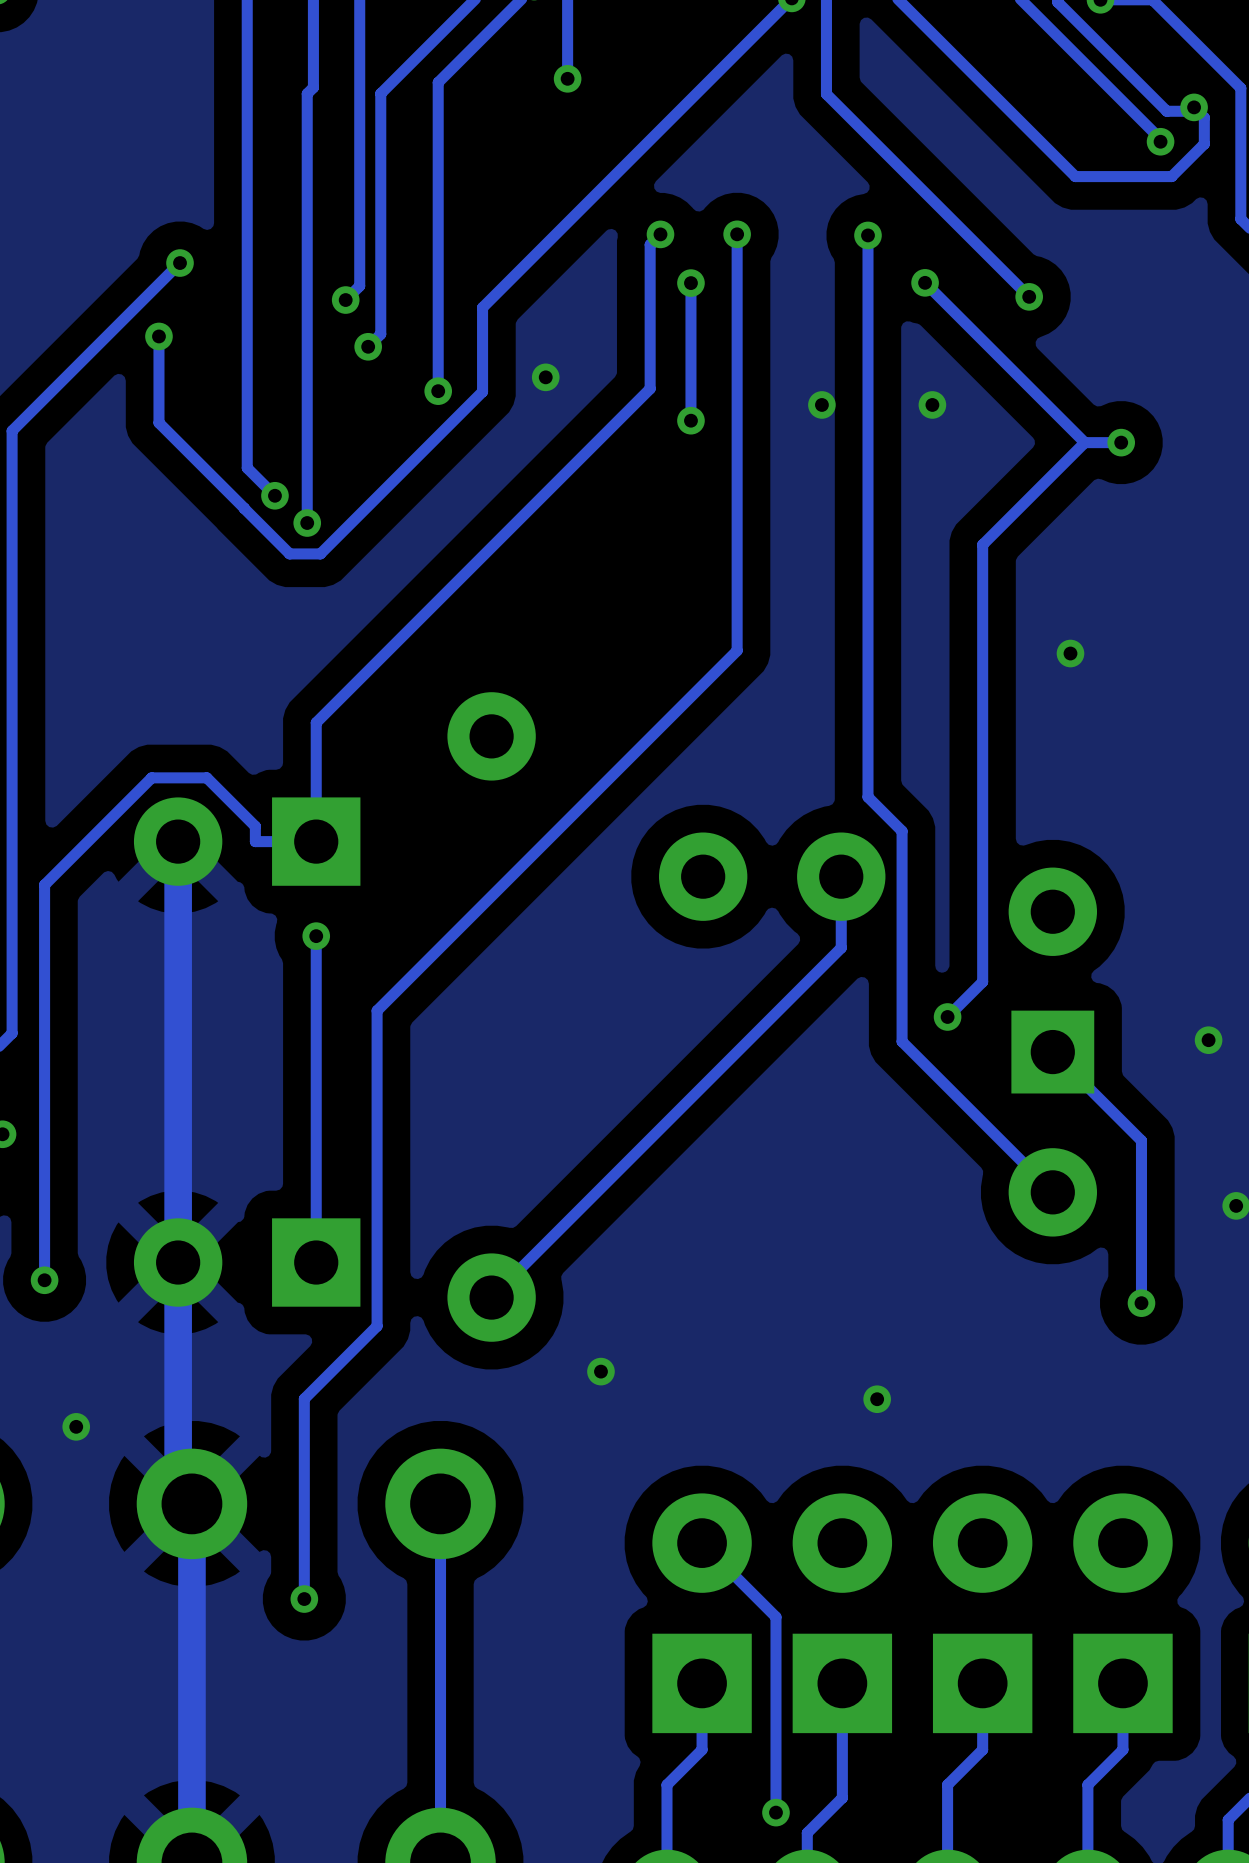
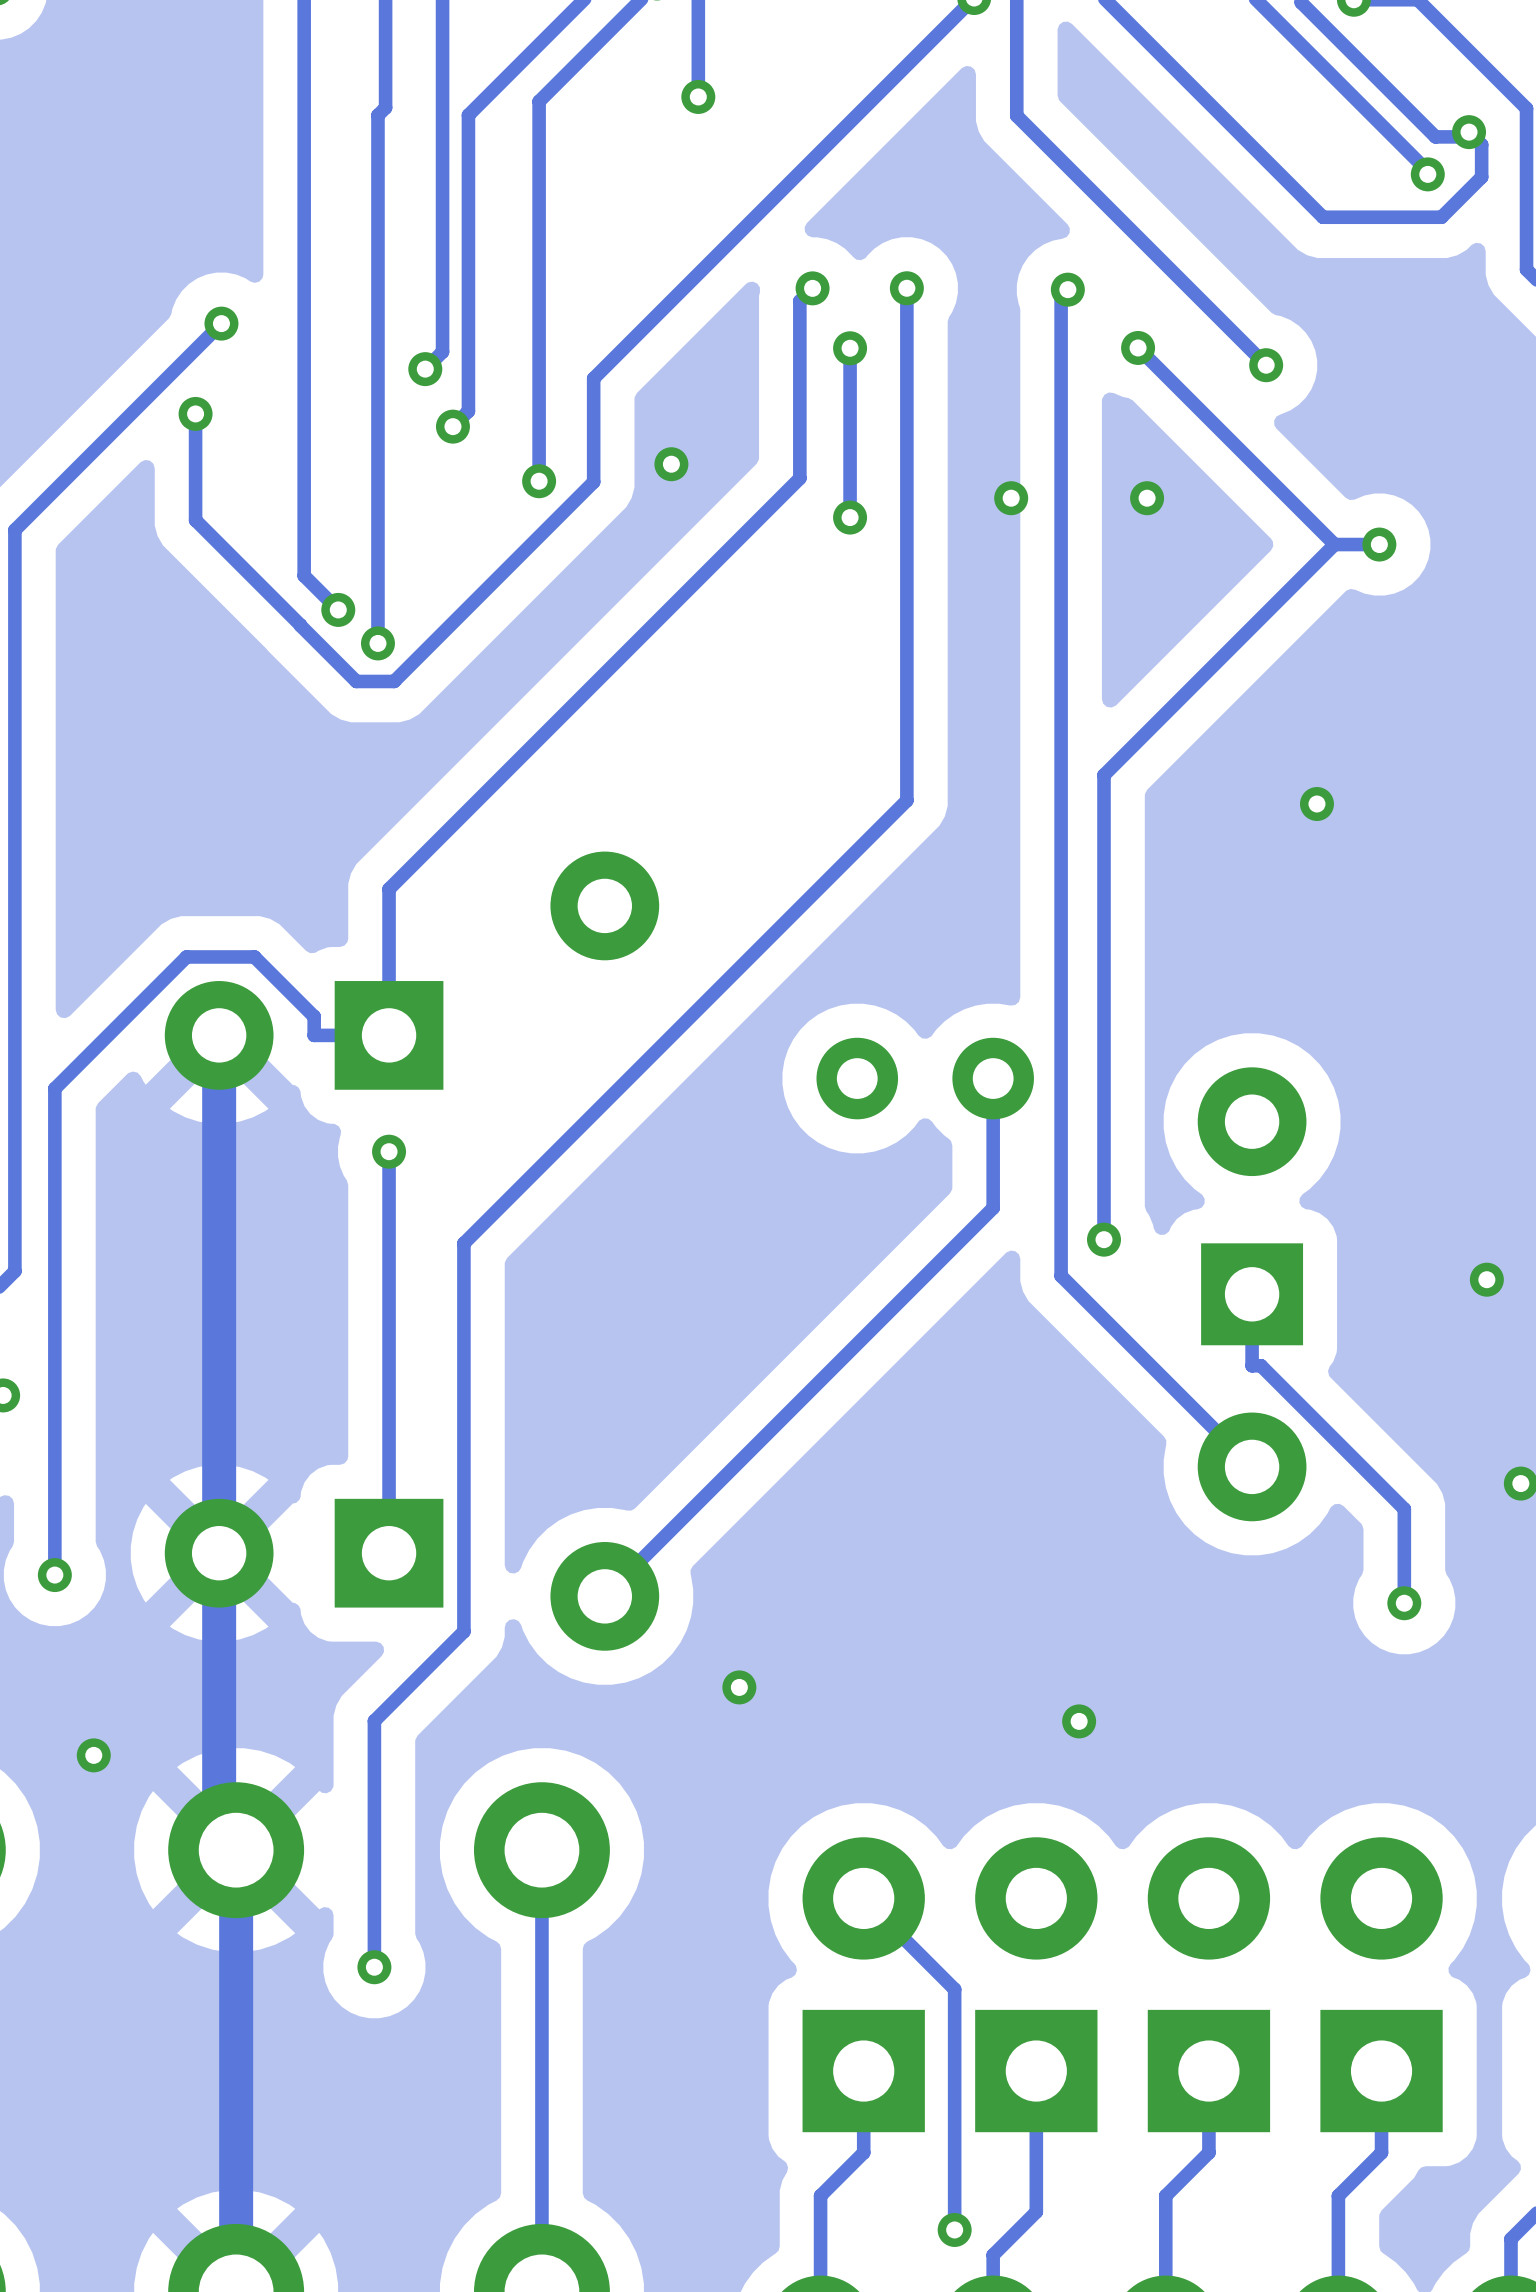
track: (867, 235) (867, 797) (902, 831) (902, 1041) (1052, 1192) -> (1067, 289) (1061, 296) (1061, 1275) (1252, 1466)
track: (982, 544) (982, 981) (947, 1016) -> (1208, 670) (1104, 775) (1104, 1239)
part footprint: [658, 832, 886, 921] -> [816, 1037, 1034, 1120]
track: (841, 876) (841, 947) (807, 981) -> (993, 1078) (993, 1208)
via position: (947, 1016) -> (1104, 1239)
track: (1052, 1052) (1141, 1140) (1141, 1226) -> (1252, 1294) (1252, 1365) (1261, 1365) (1404, 1509)
part position: (1052, 1052) -> (1252, 1294)

